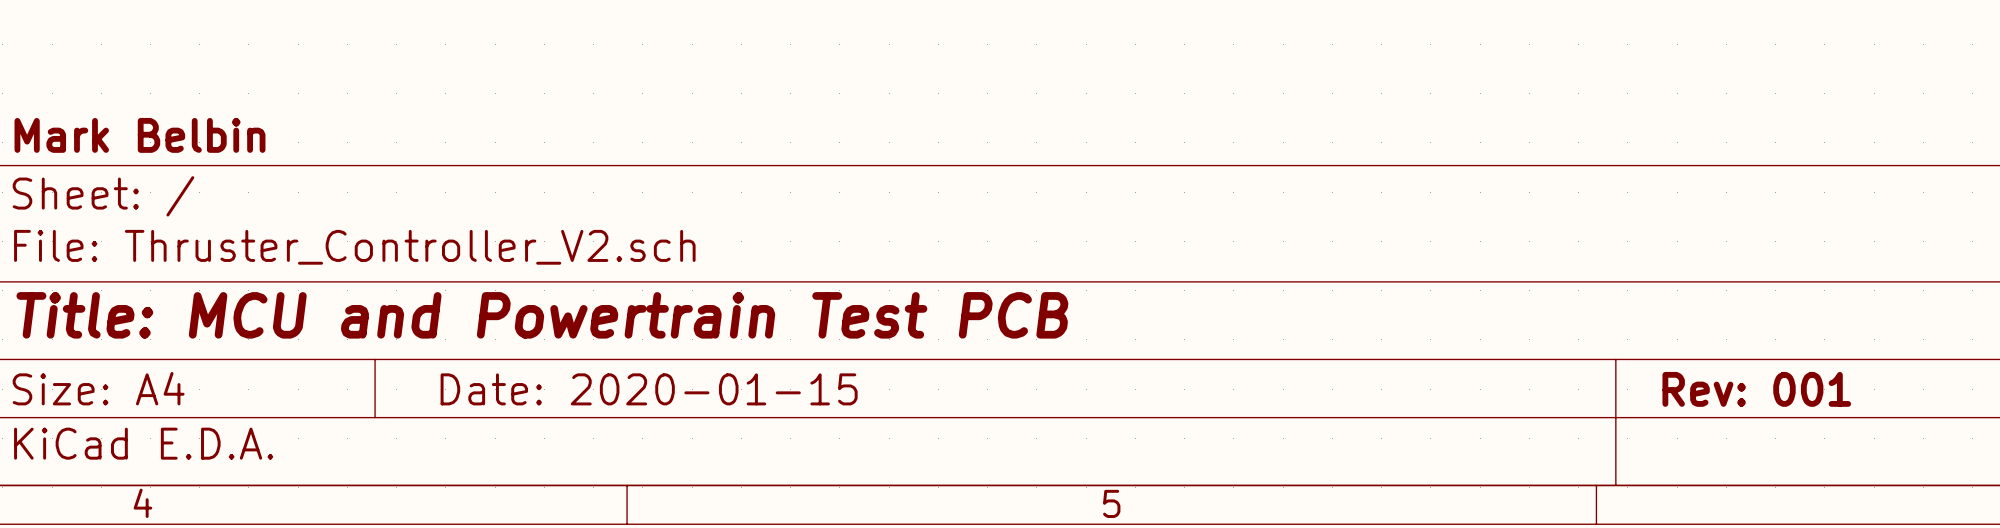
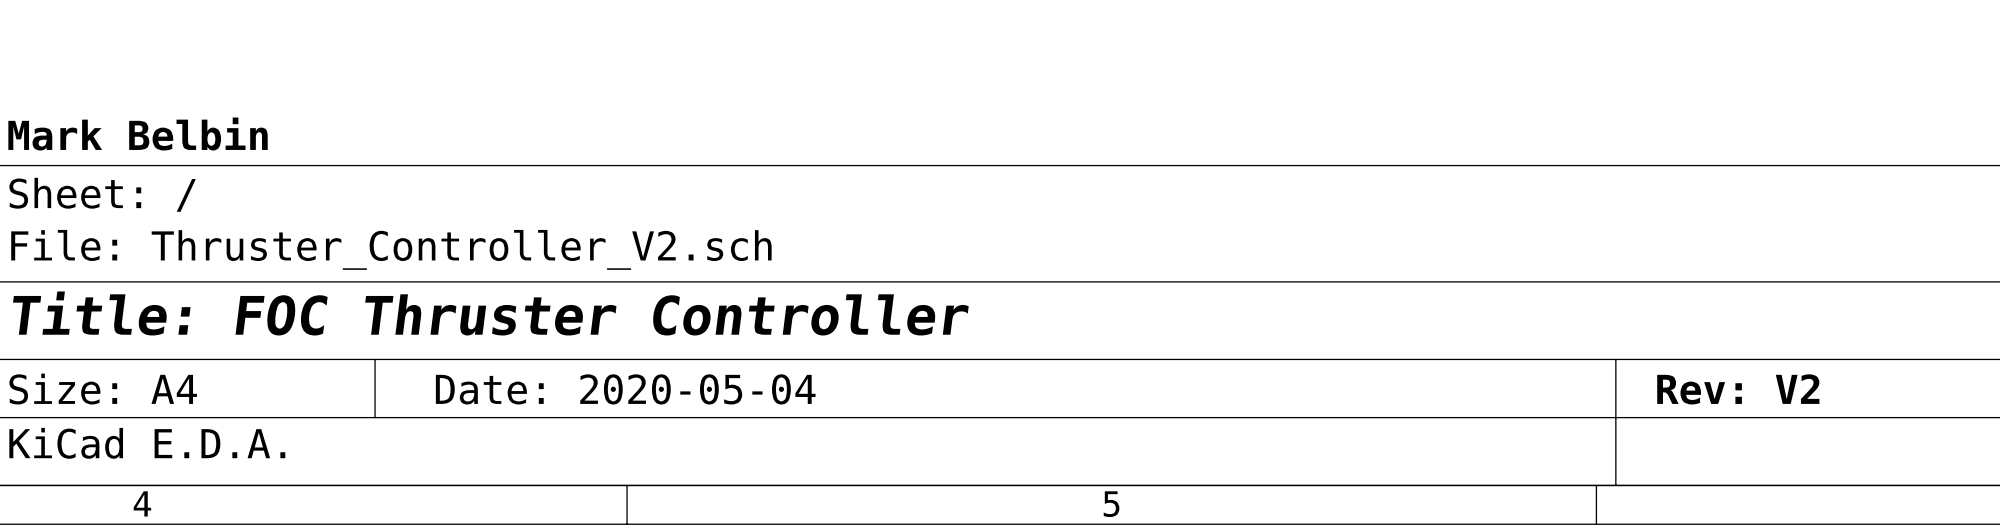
title block: Title: MCU and Powertrain Test PCB (542, 315) -> Title: FOC Thruster Controller (490, 313)
title block: Date: 2020-01-15 (649, 389) -> Date: 2020-05-04 (625, 389)
title block: Rev: 001 (1756, 389) -> Rev: V2 (1738, 389)

